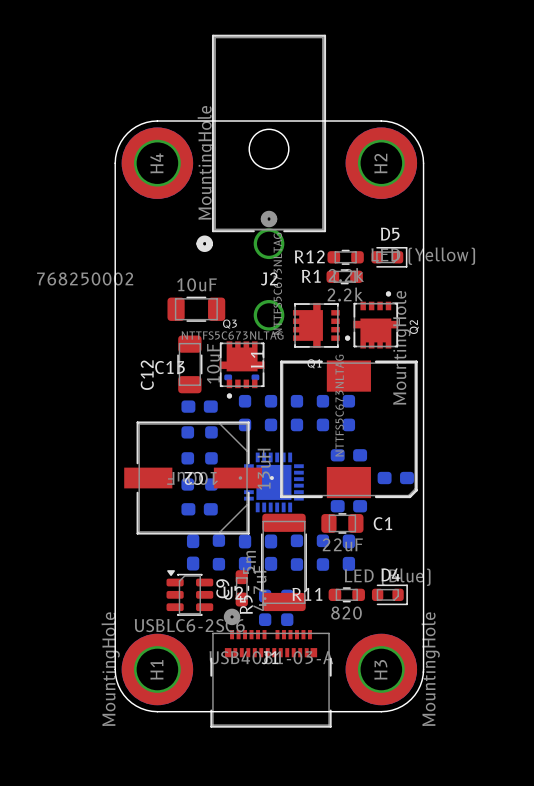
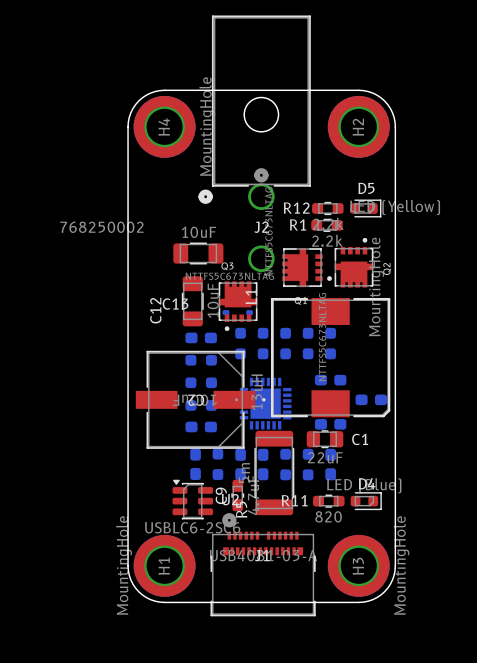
part: (265, 607) -> none
part: (287, 607) -> none

